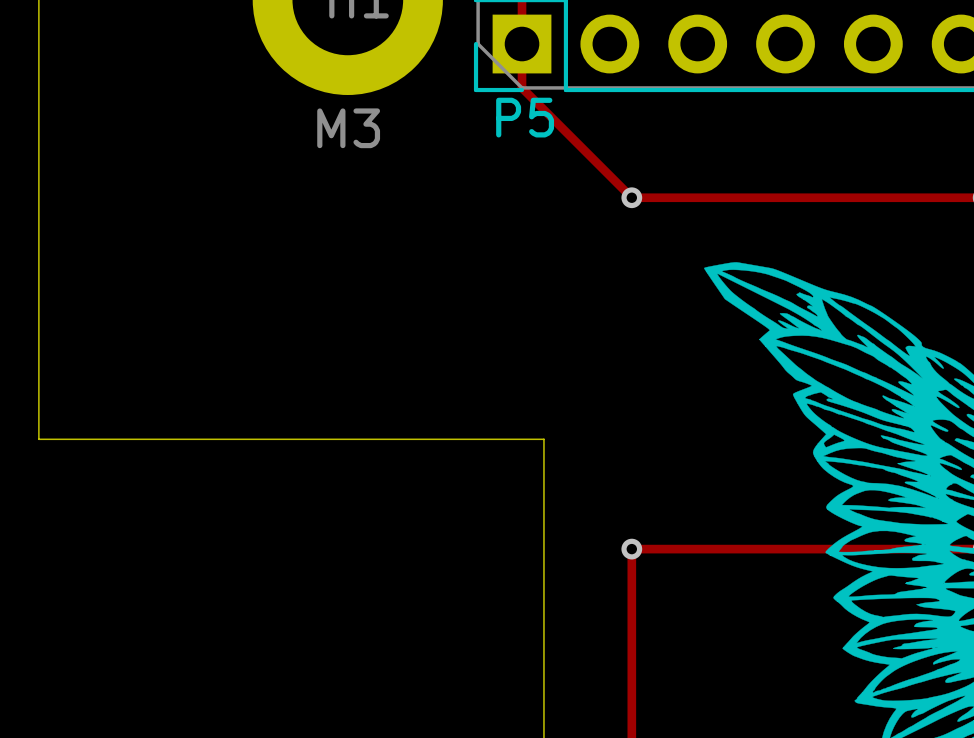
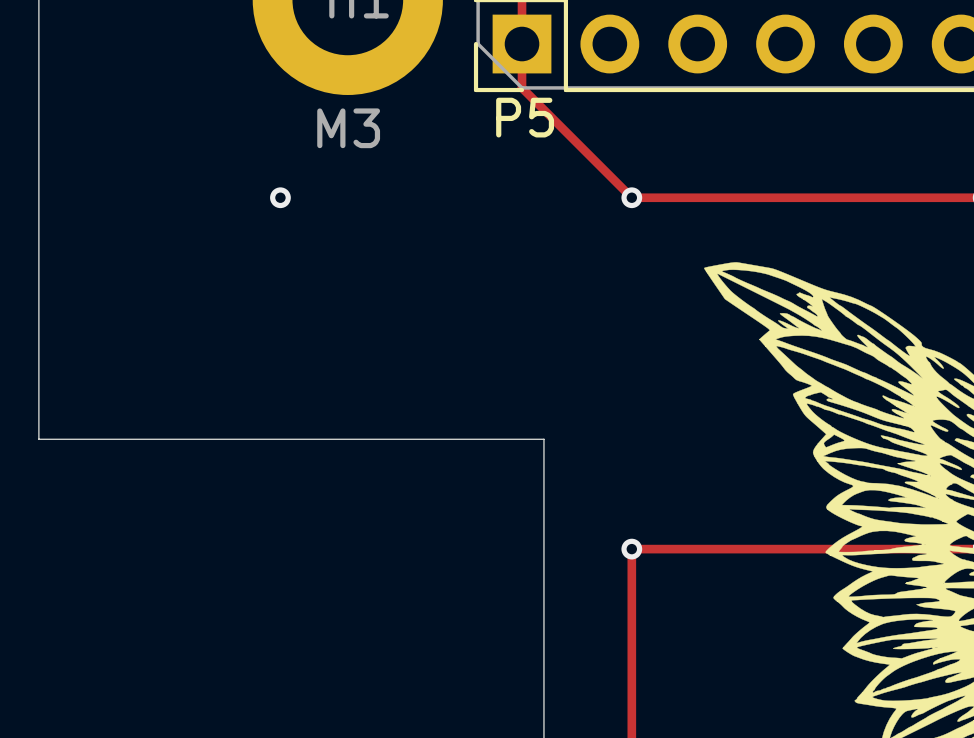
via: none -> (280, 197)

